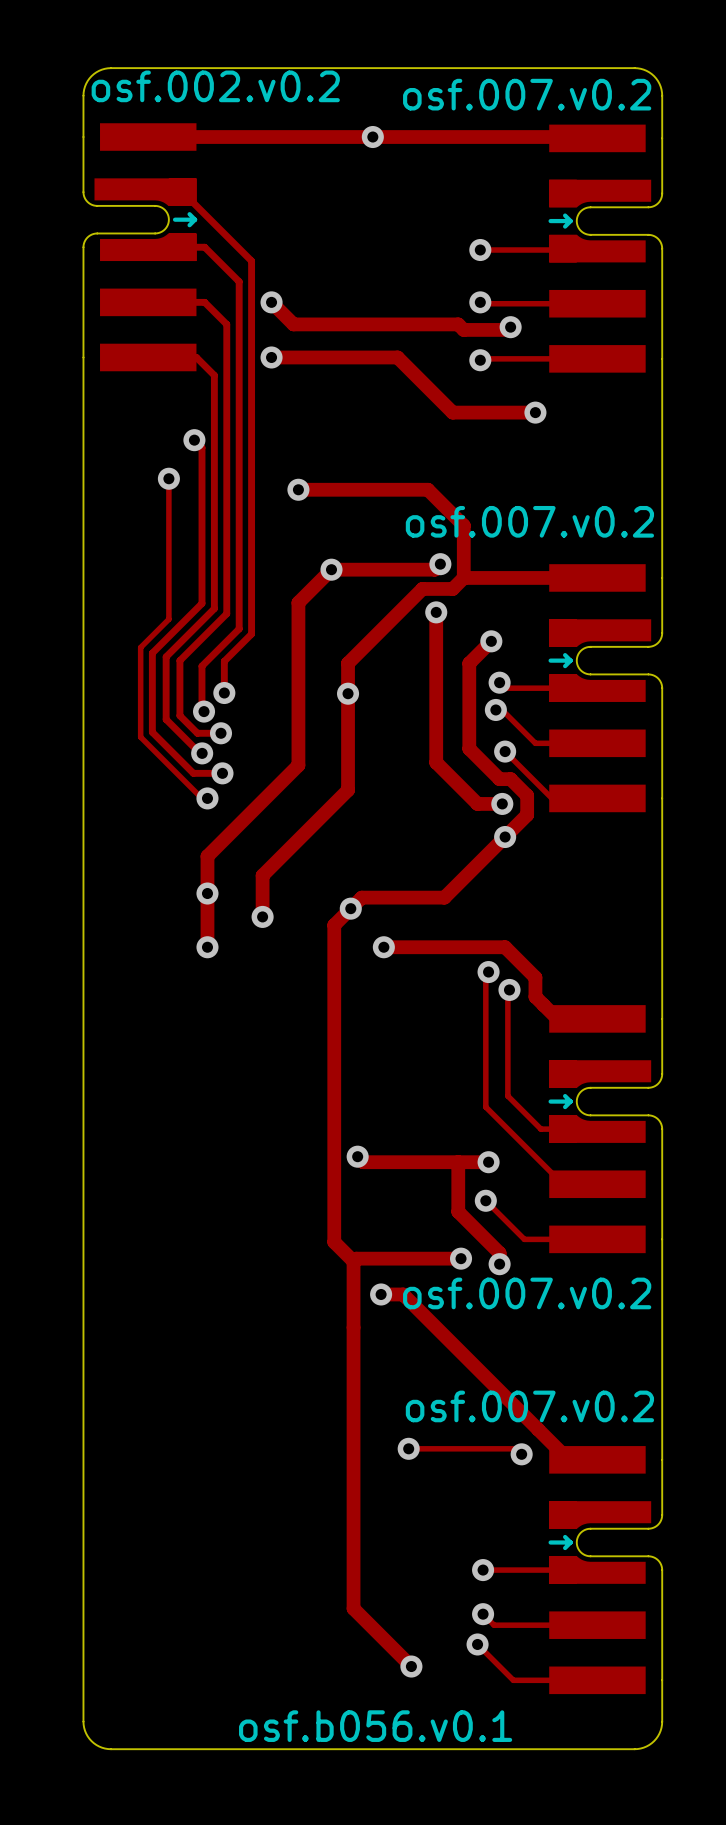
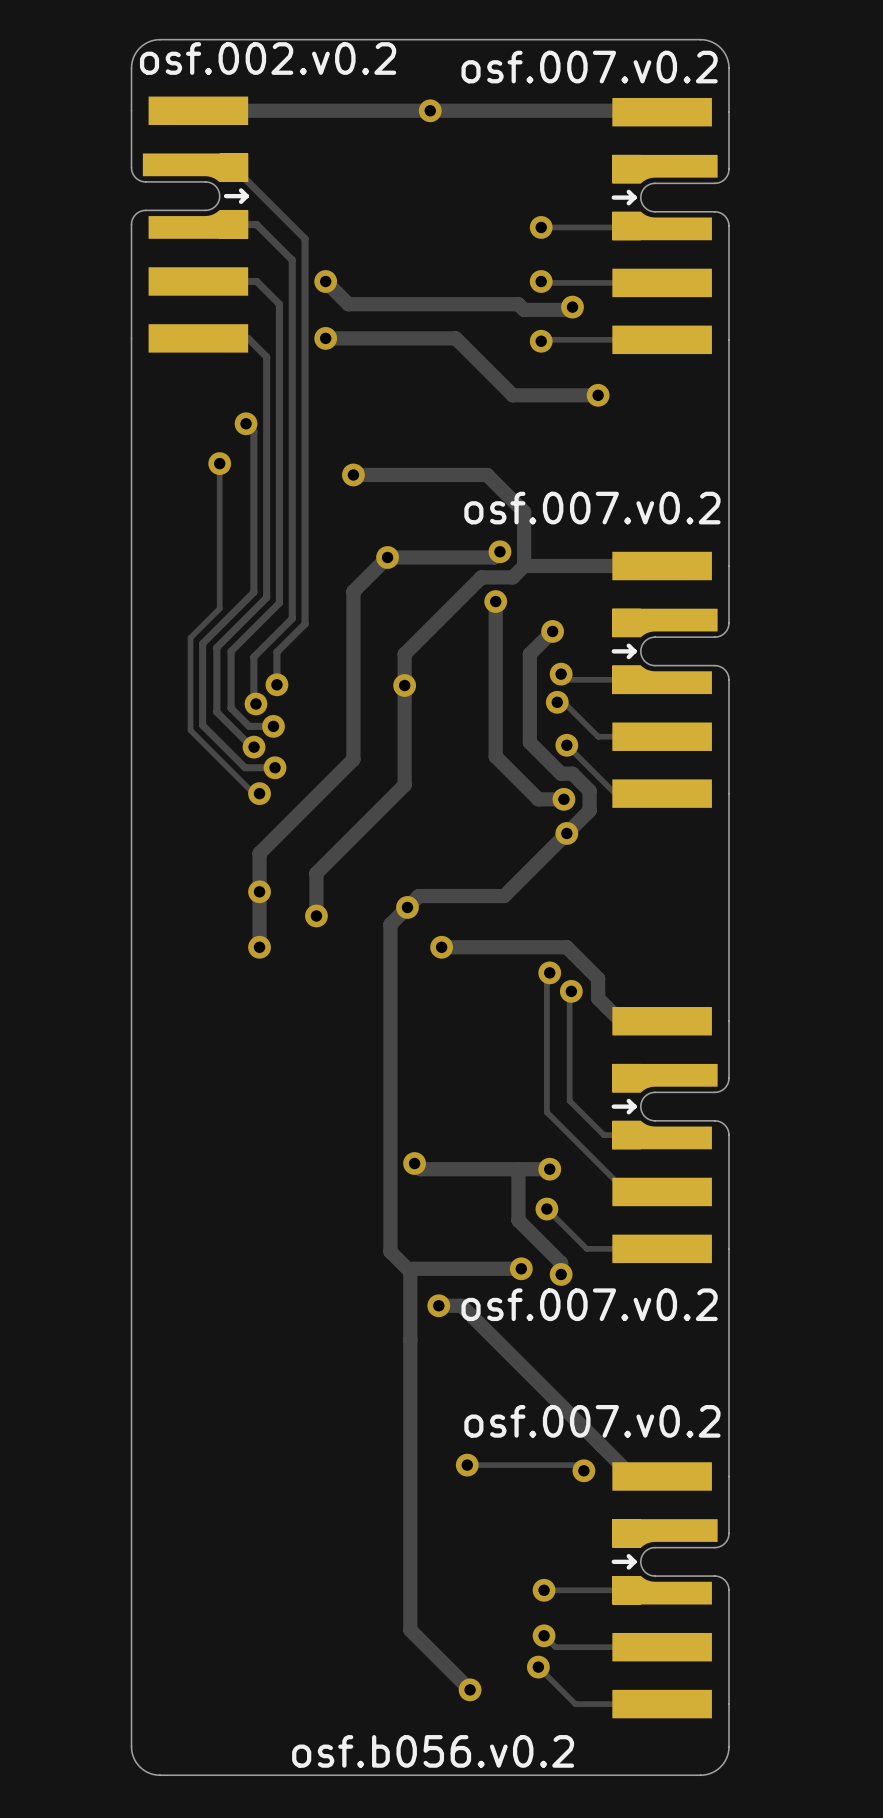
text: osf.b056.v0.1 (375, 1726) -> osf.b056.v0.2 (433, 1751)

